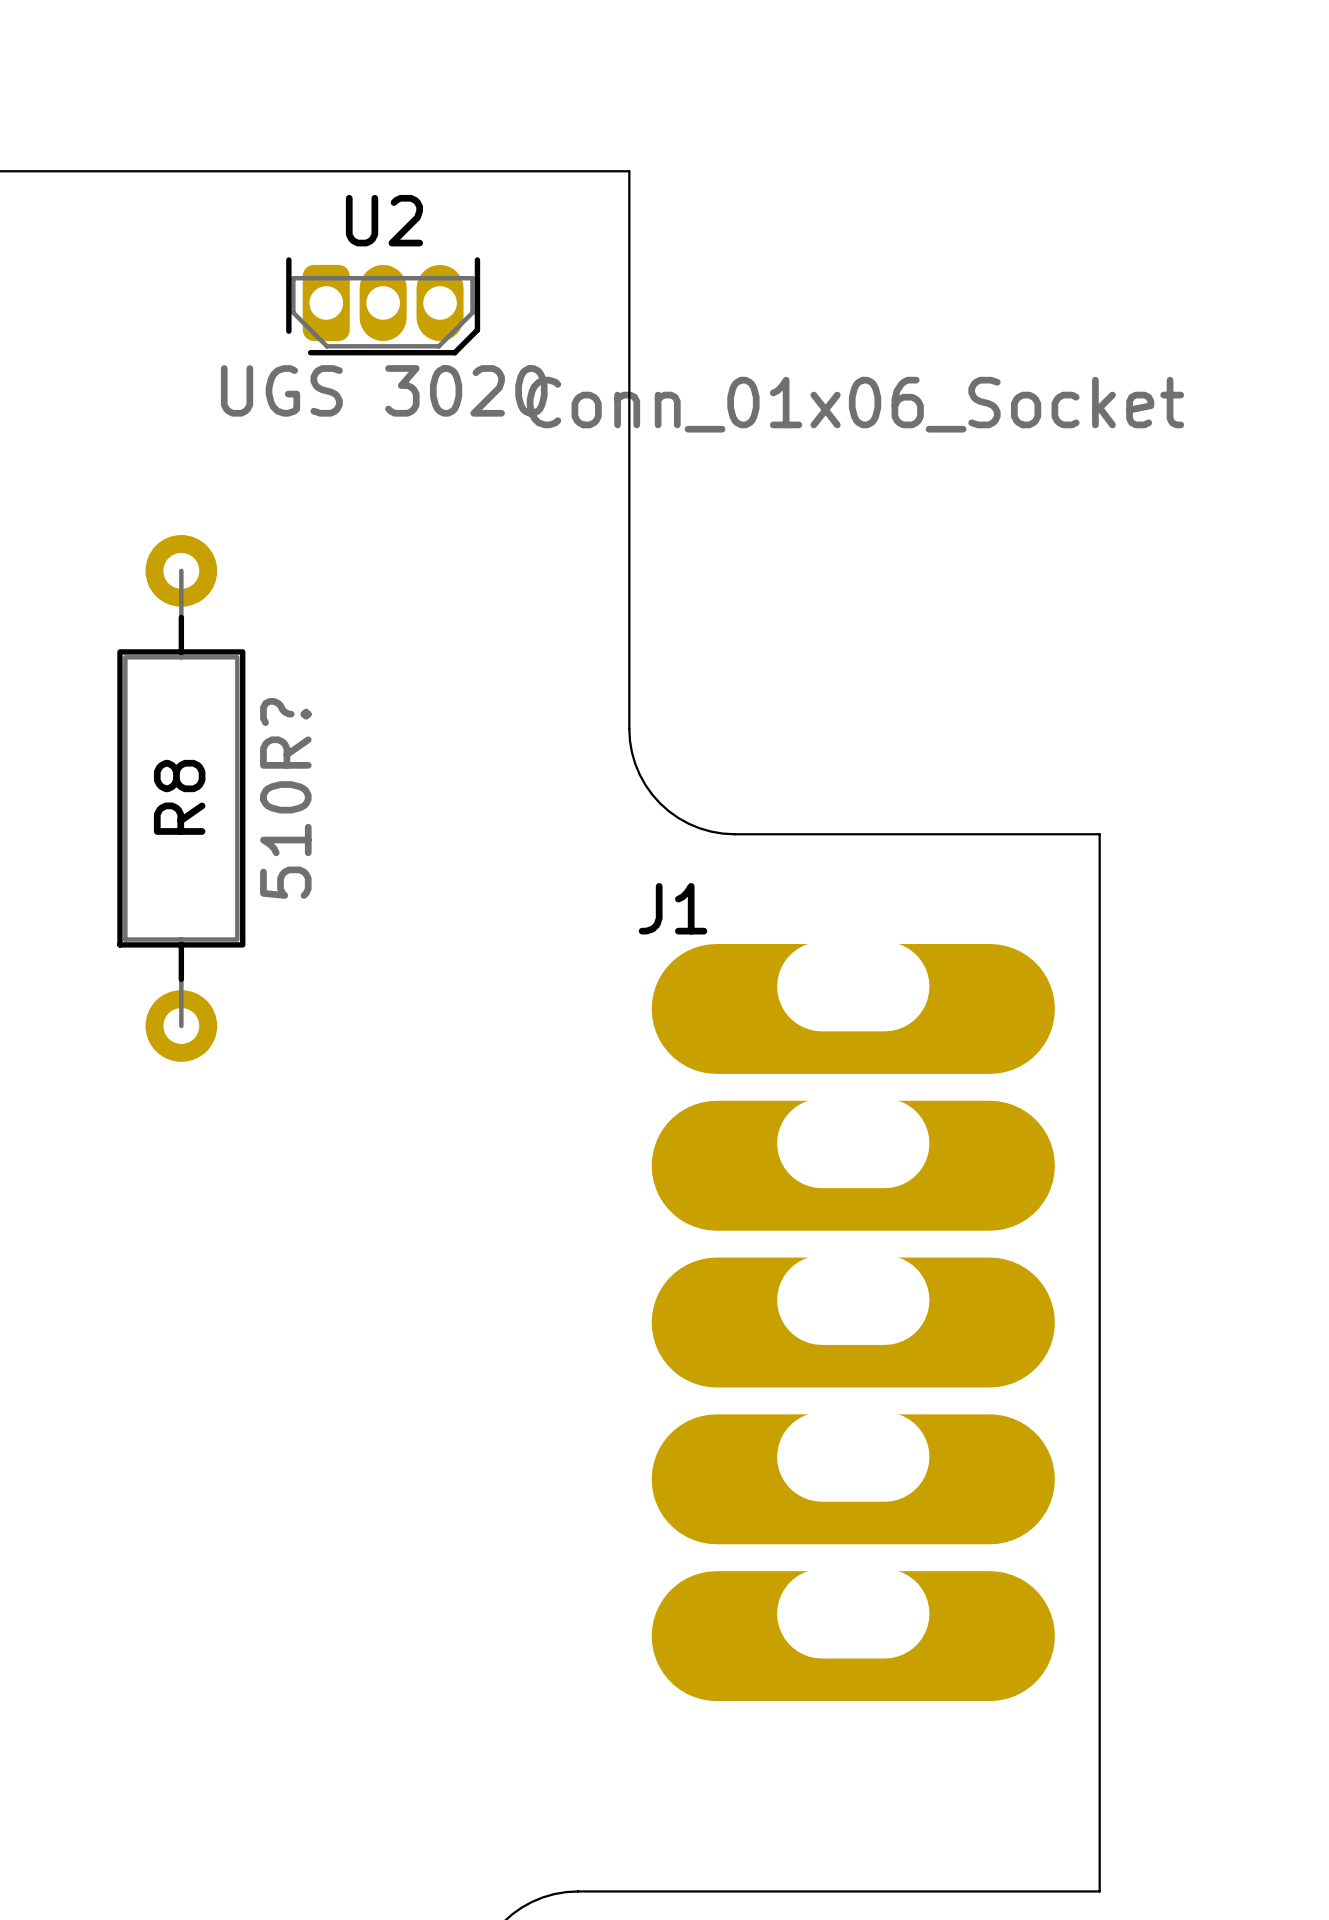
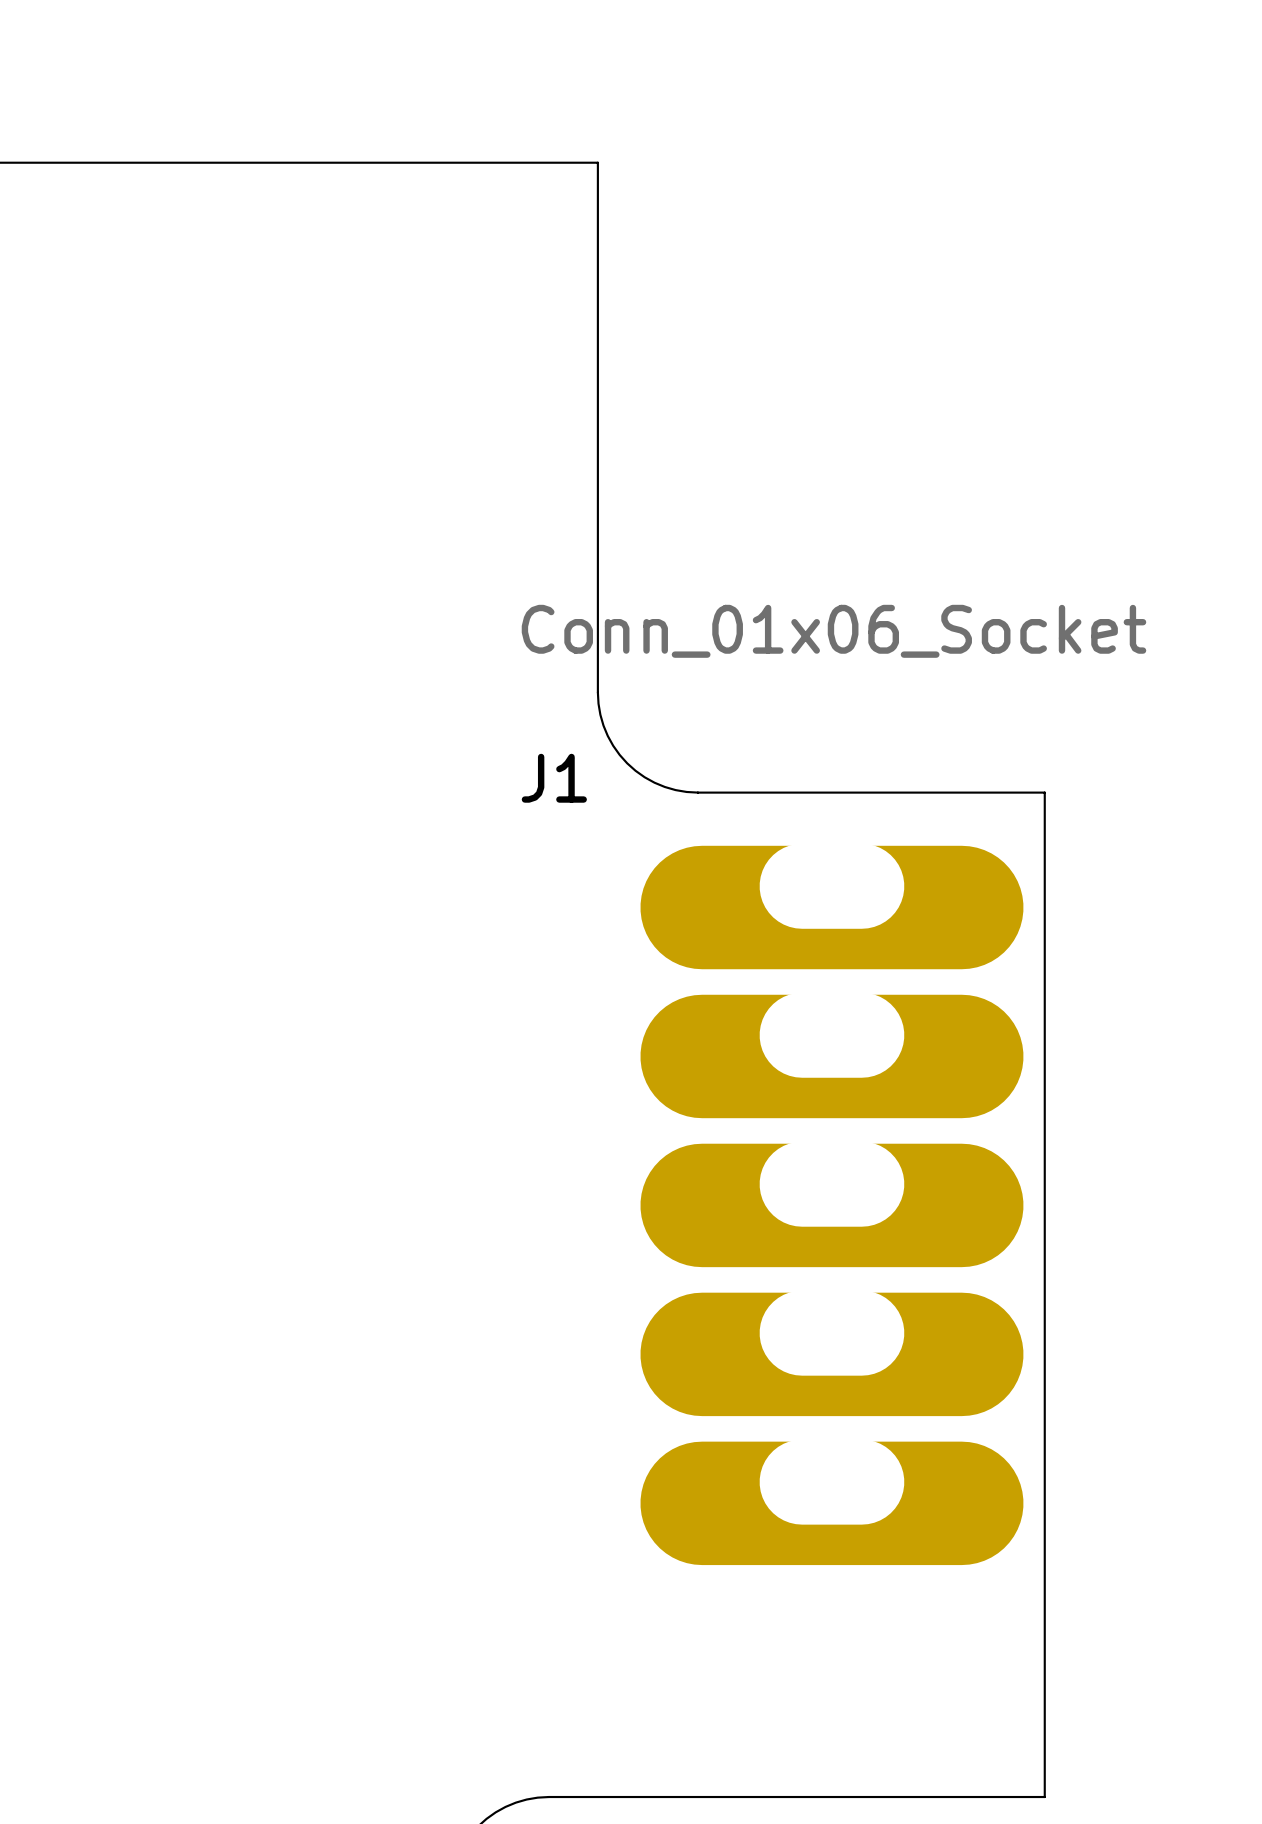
U2: UGS 3020 (383, 306) -> none
J1 value position: Conn_01x06_Socket (855, 404) -> Conn_01x06_Socket (834, 631)
R8: 510R? (181, 798) -> none
J1 name position: J1 (673, 908) -> J1 (554, 778)
J1 position: (853, 1321) -> (831, 1204)

